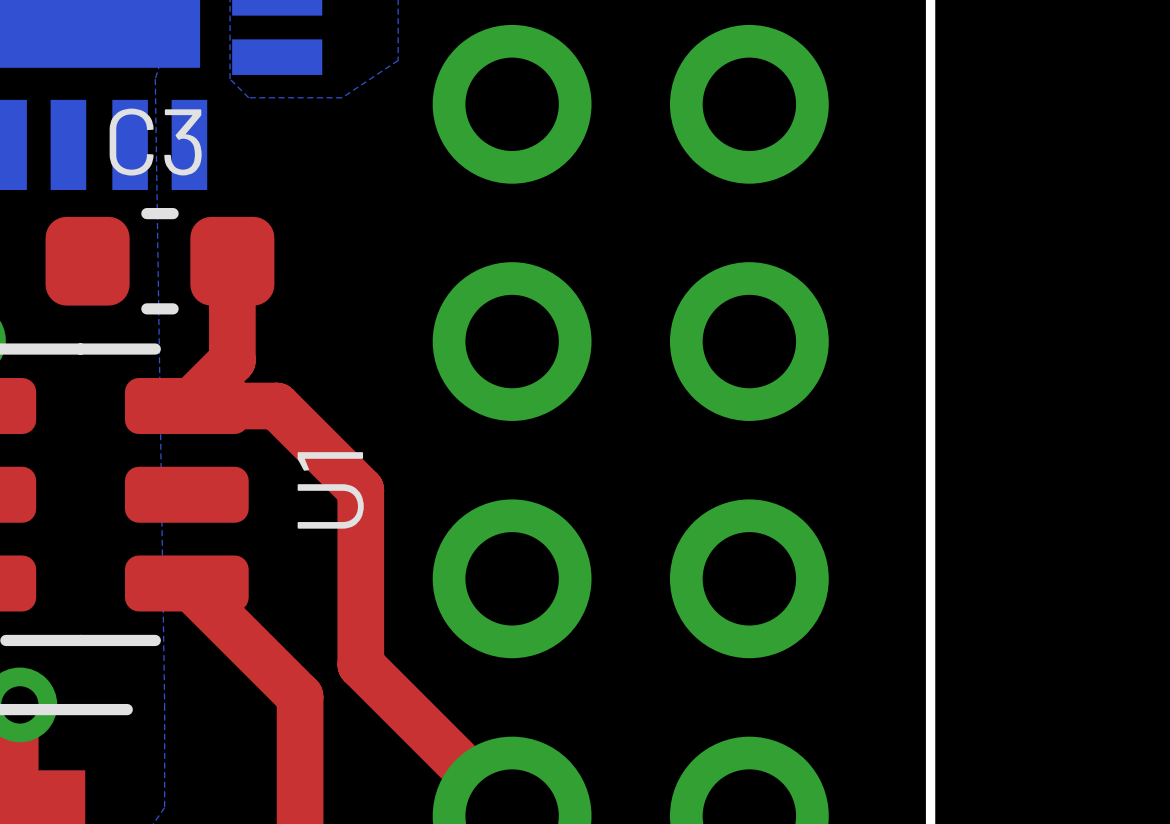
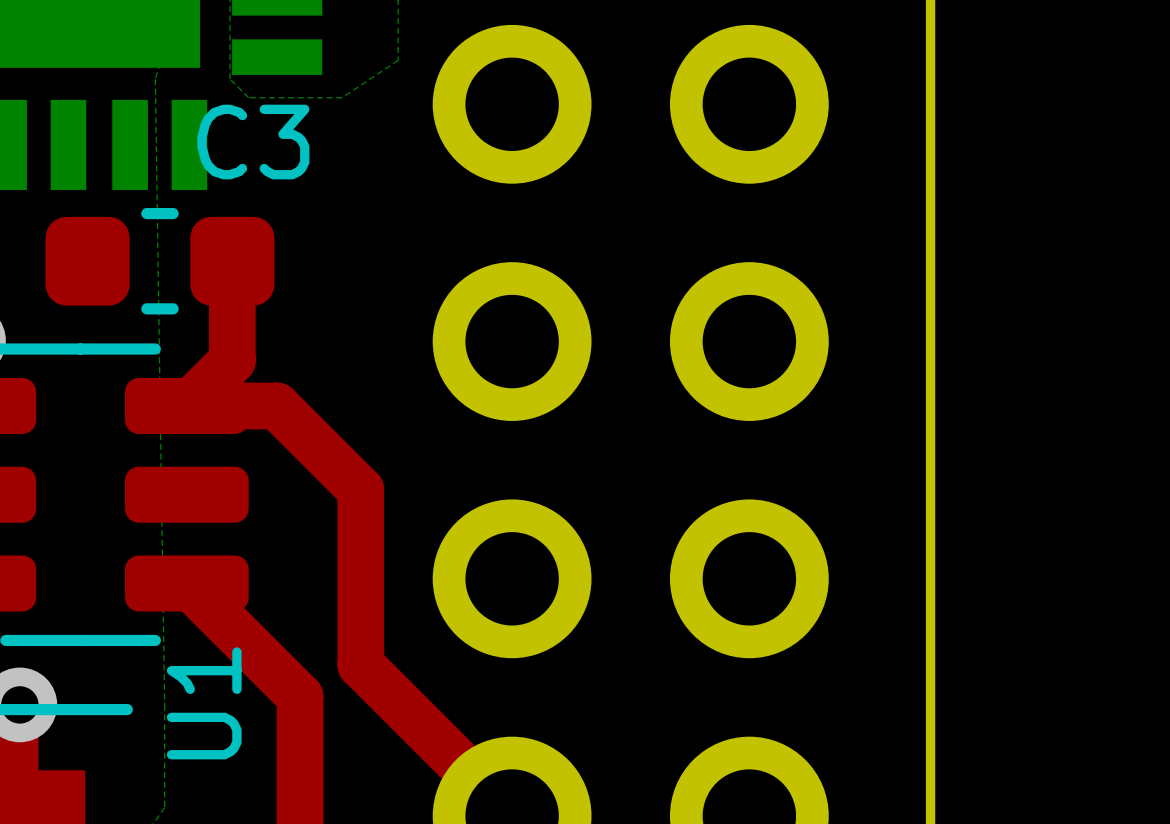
C3 name position: C3 (155, 142) -> C3 (253, 142)
U1 name position: U1 (330, 490) -> U1 (204, 703)

